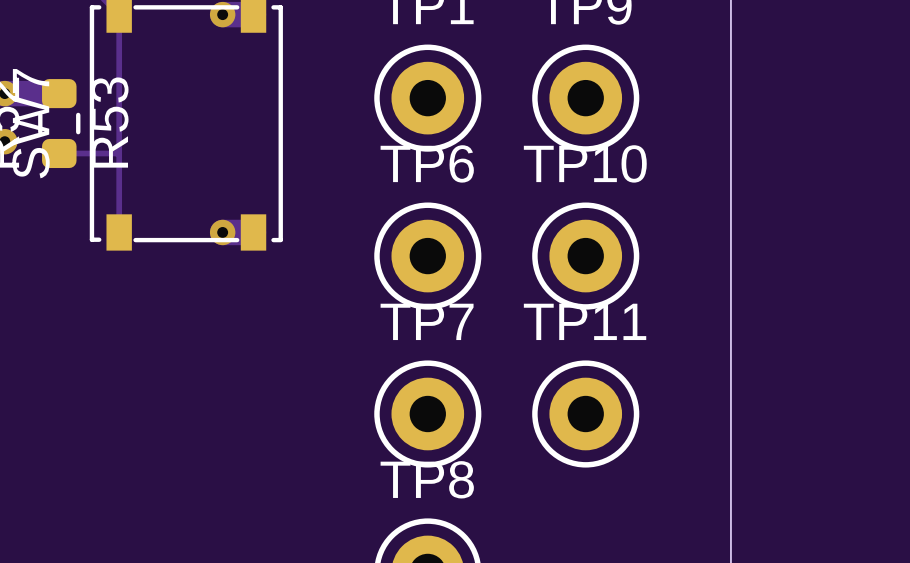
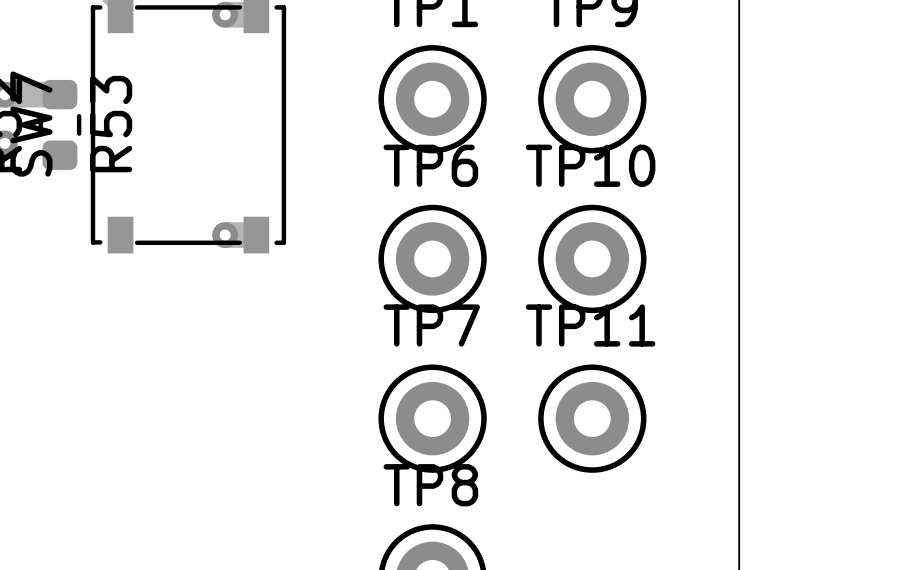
track: (119, 14) (119, 232) -> none
track: (119, 150) (116, 153) (59, 153) -> none

